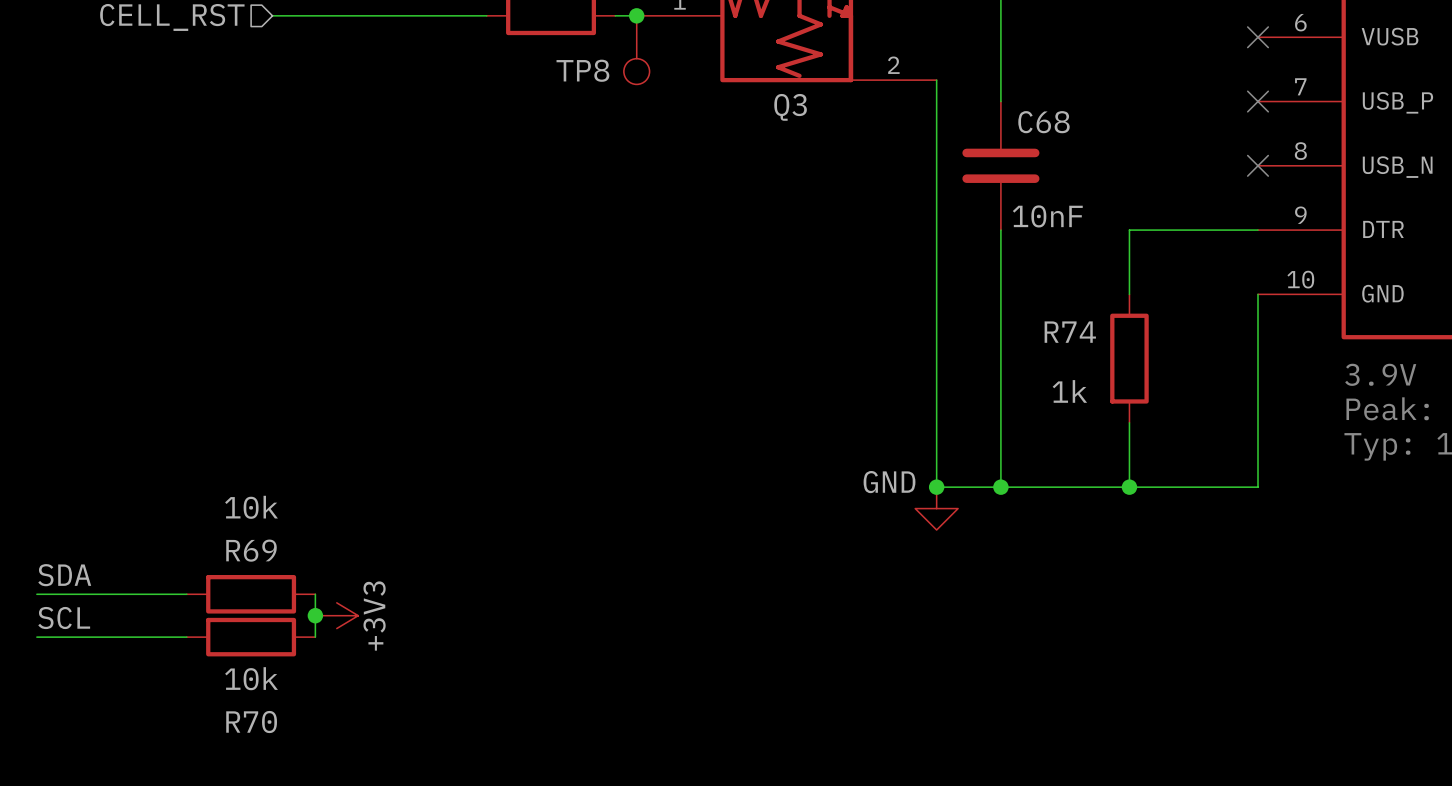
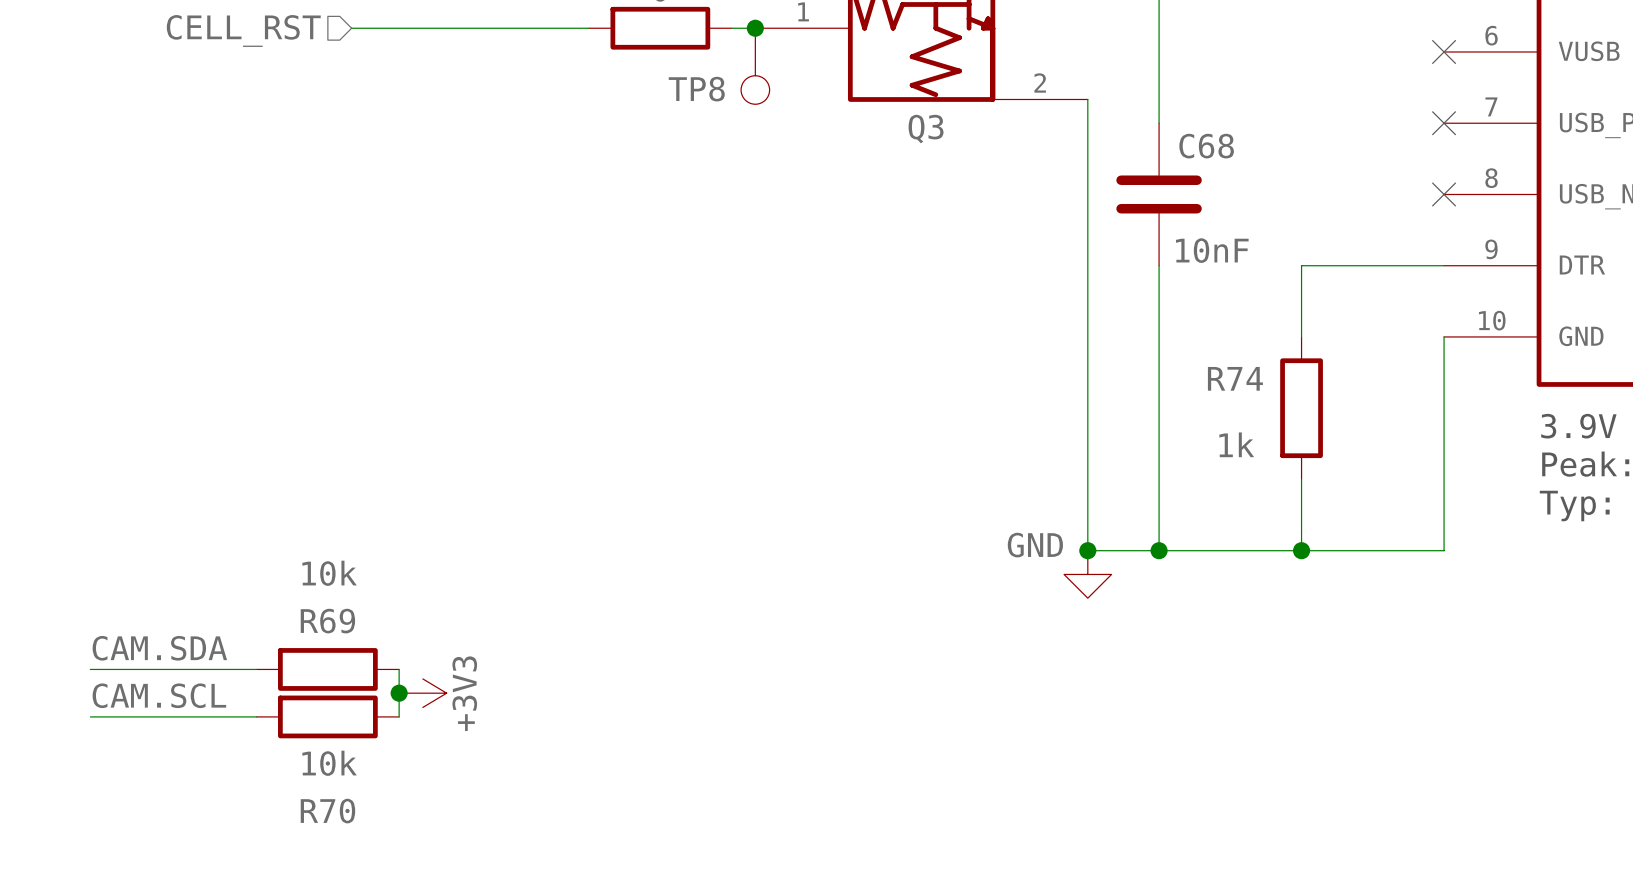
label: SDA (64, 575) -> CAM.SDA (159, 648)
label: SCL (64, 618) -> CAM.SCL (159, 695)

